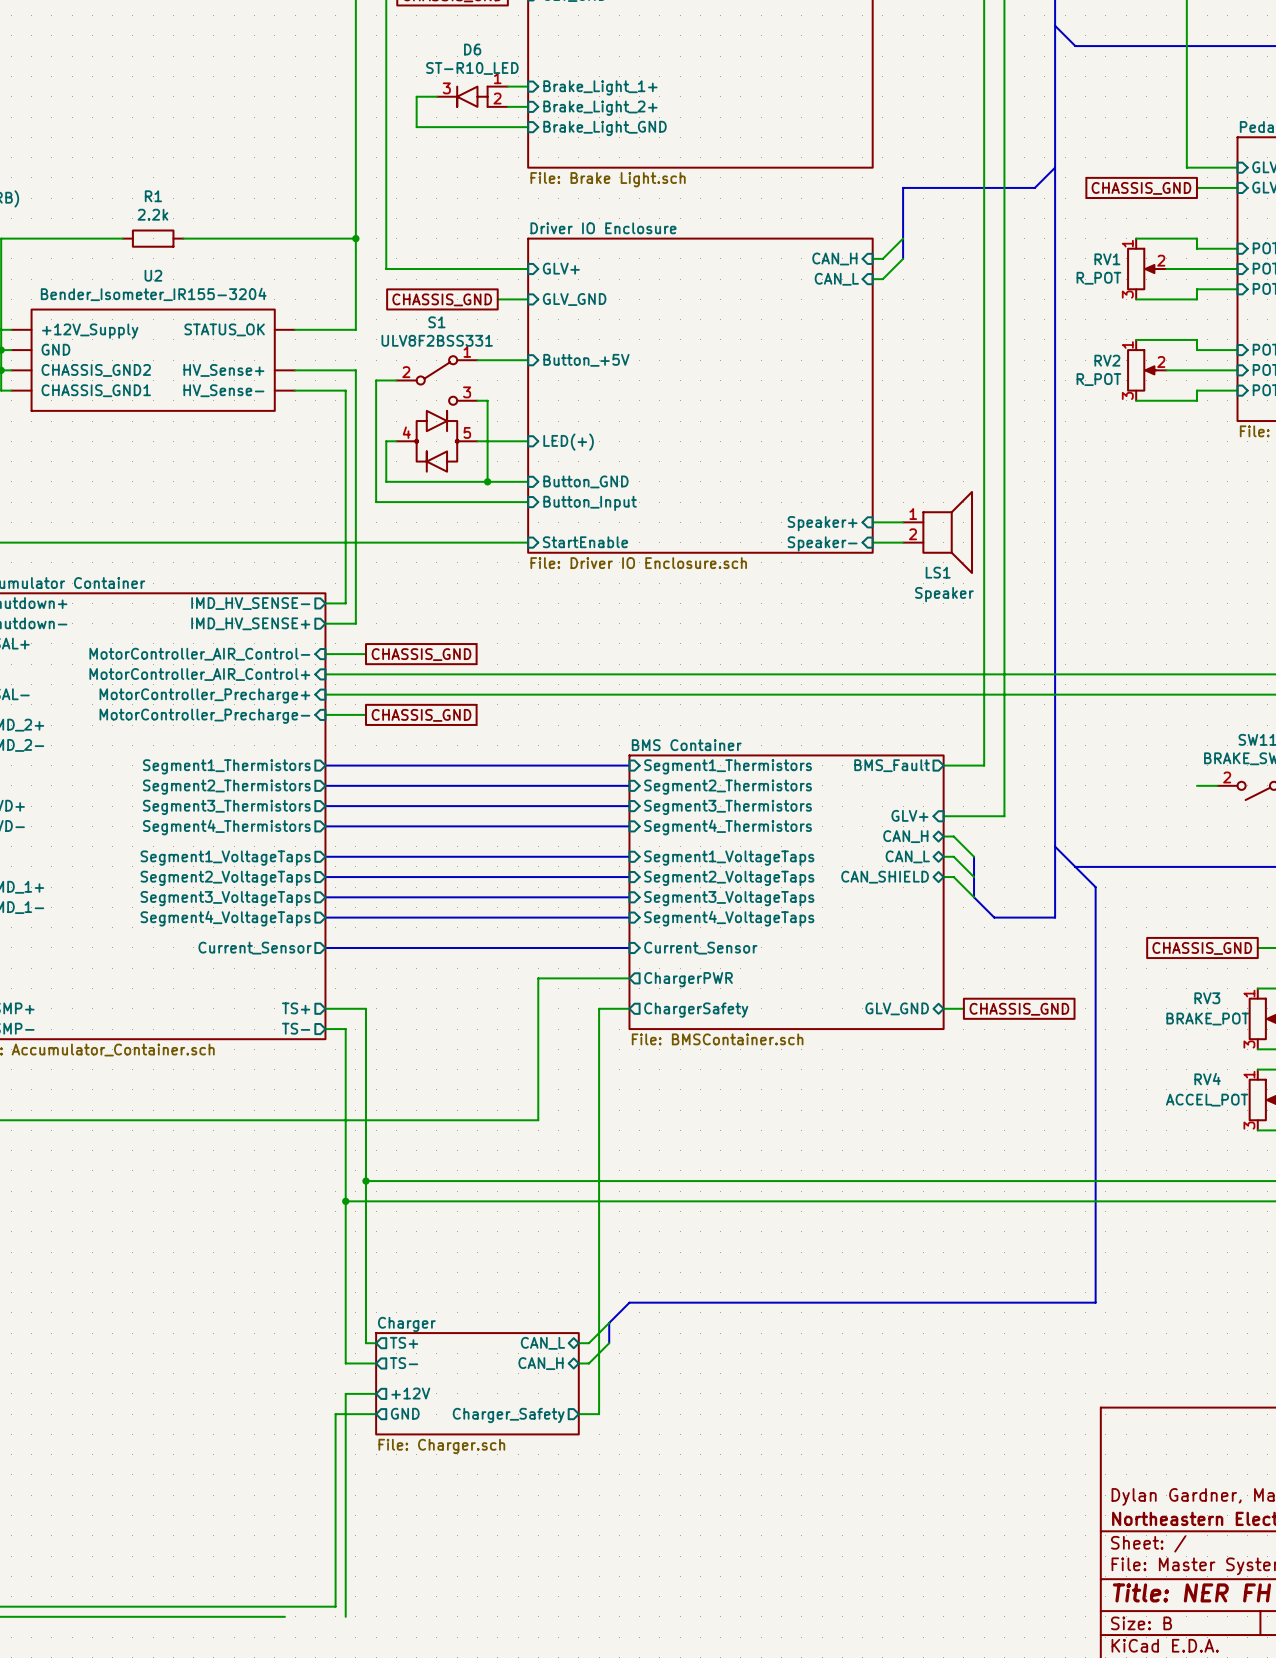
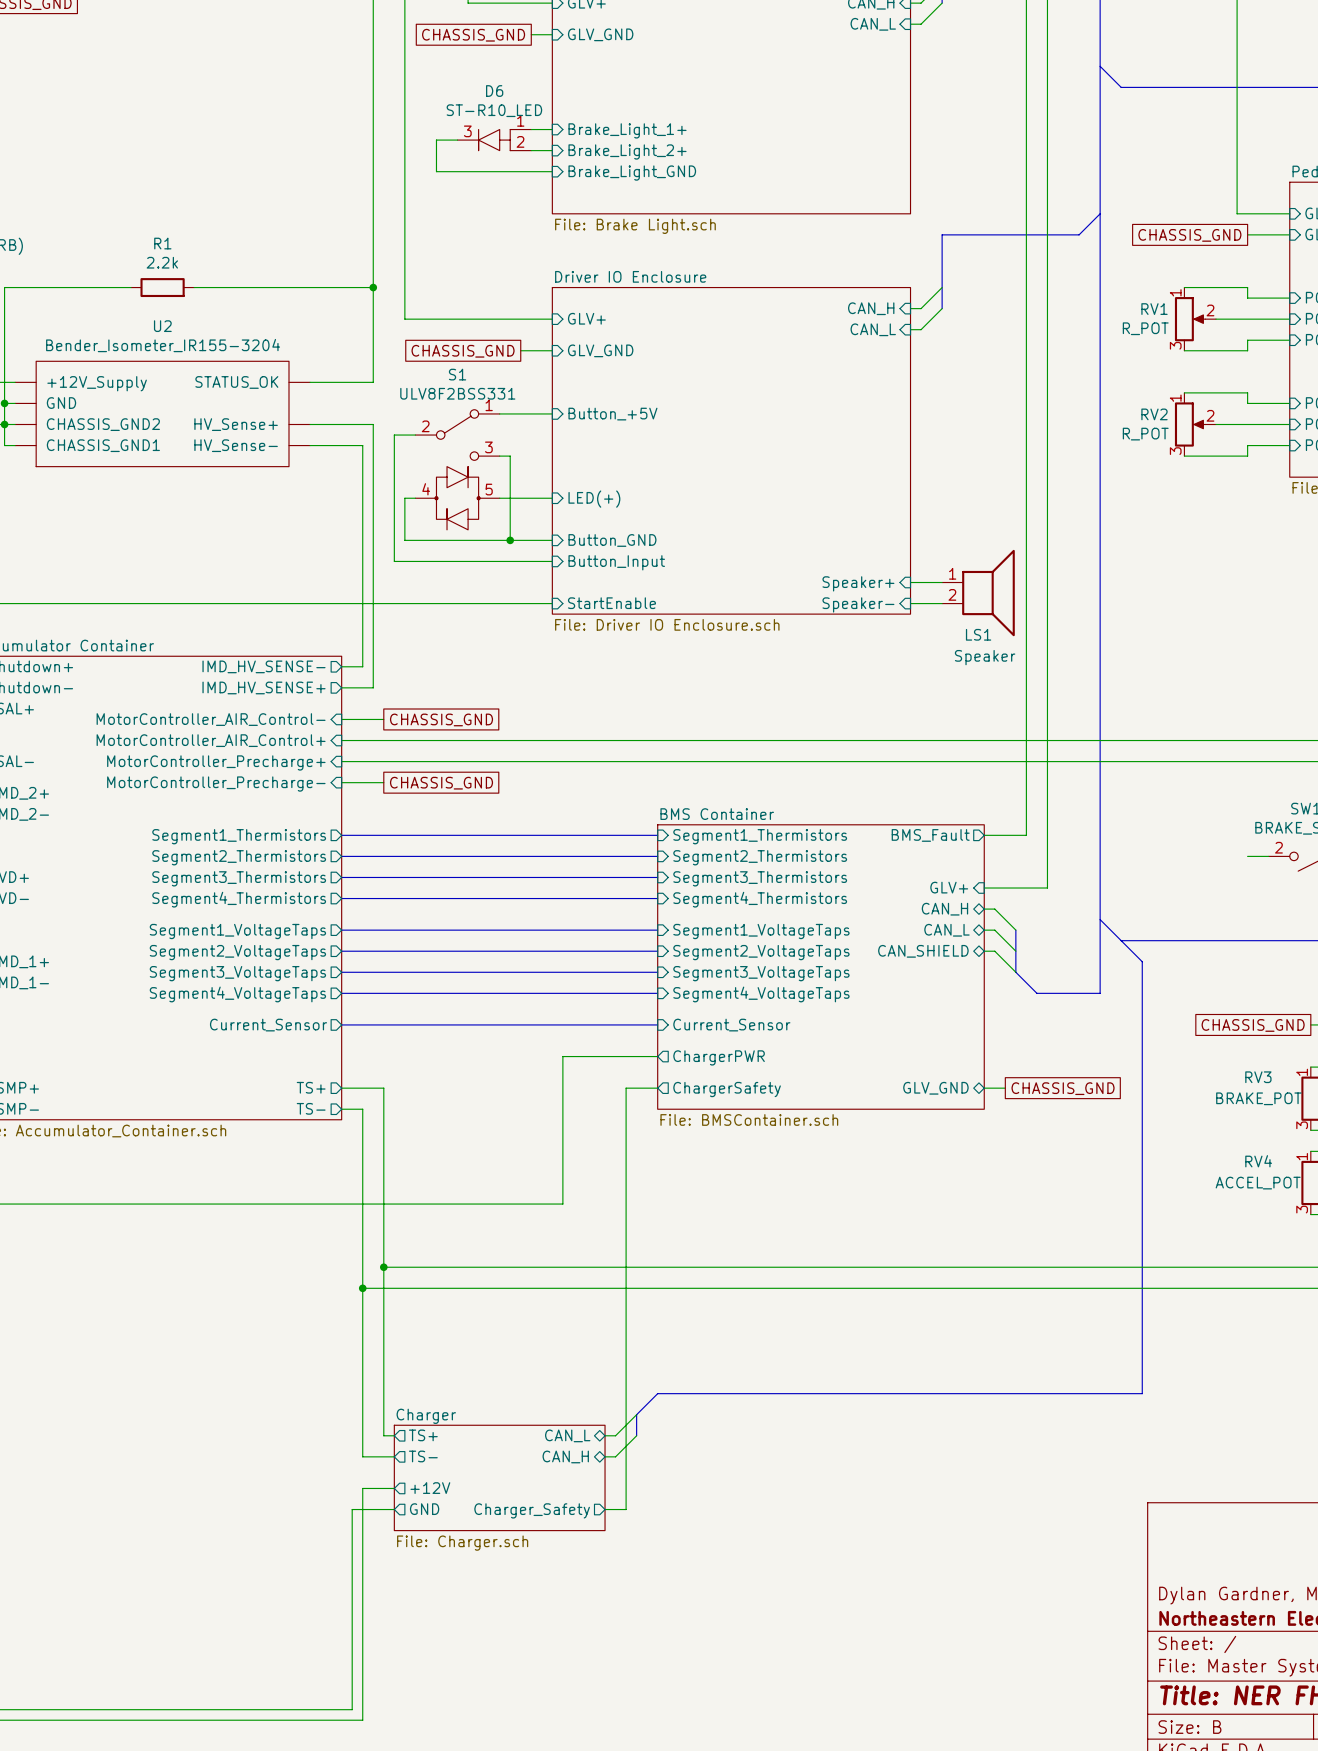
wire: none -> (299, 1720) (362, 1720)

